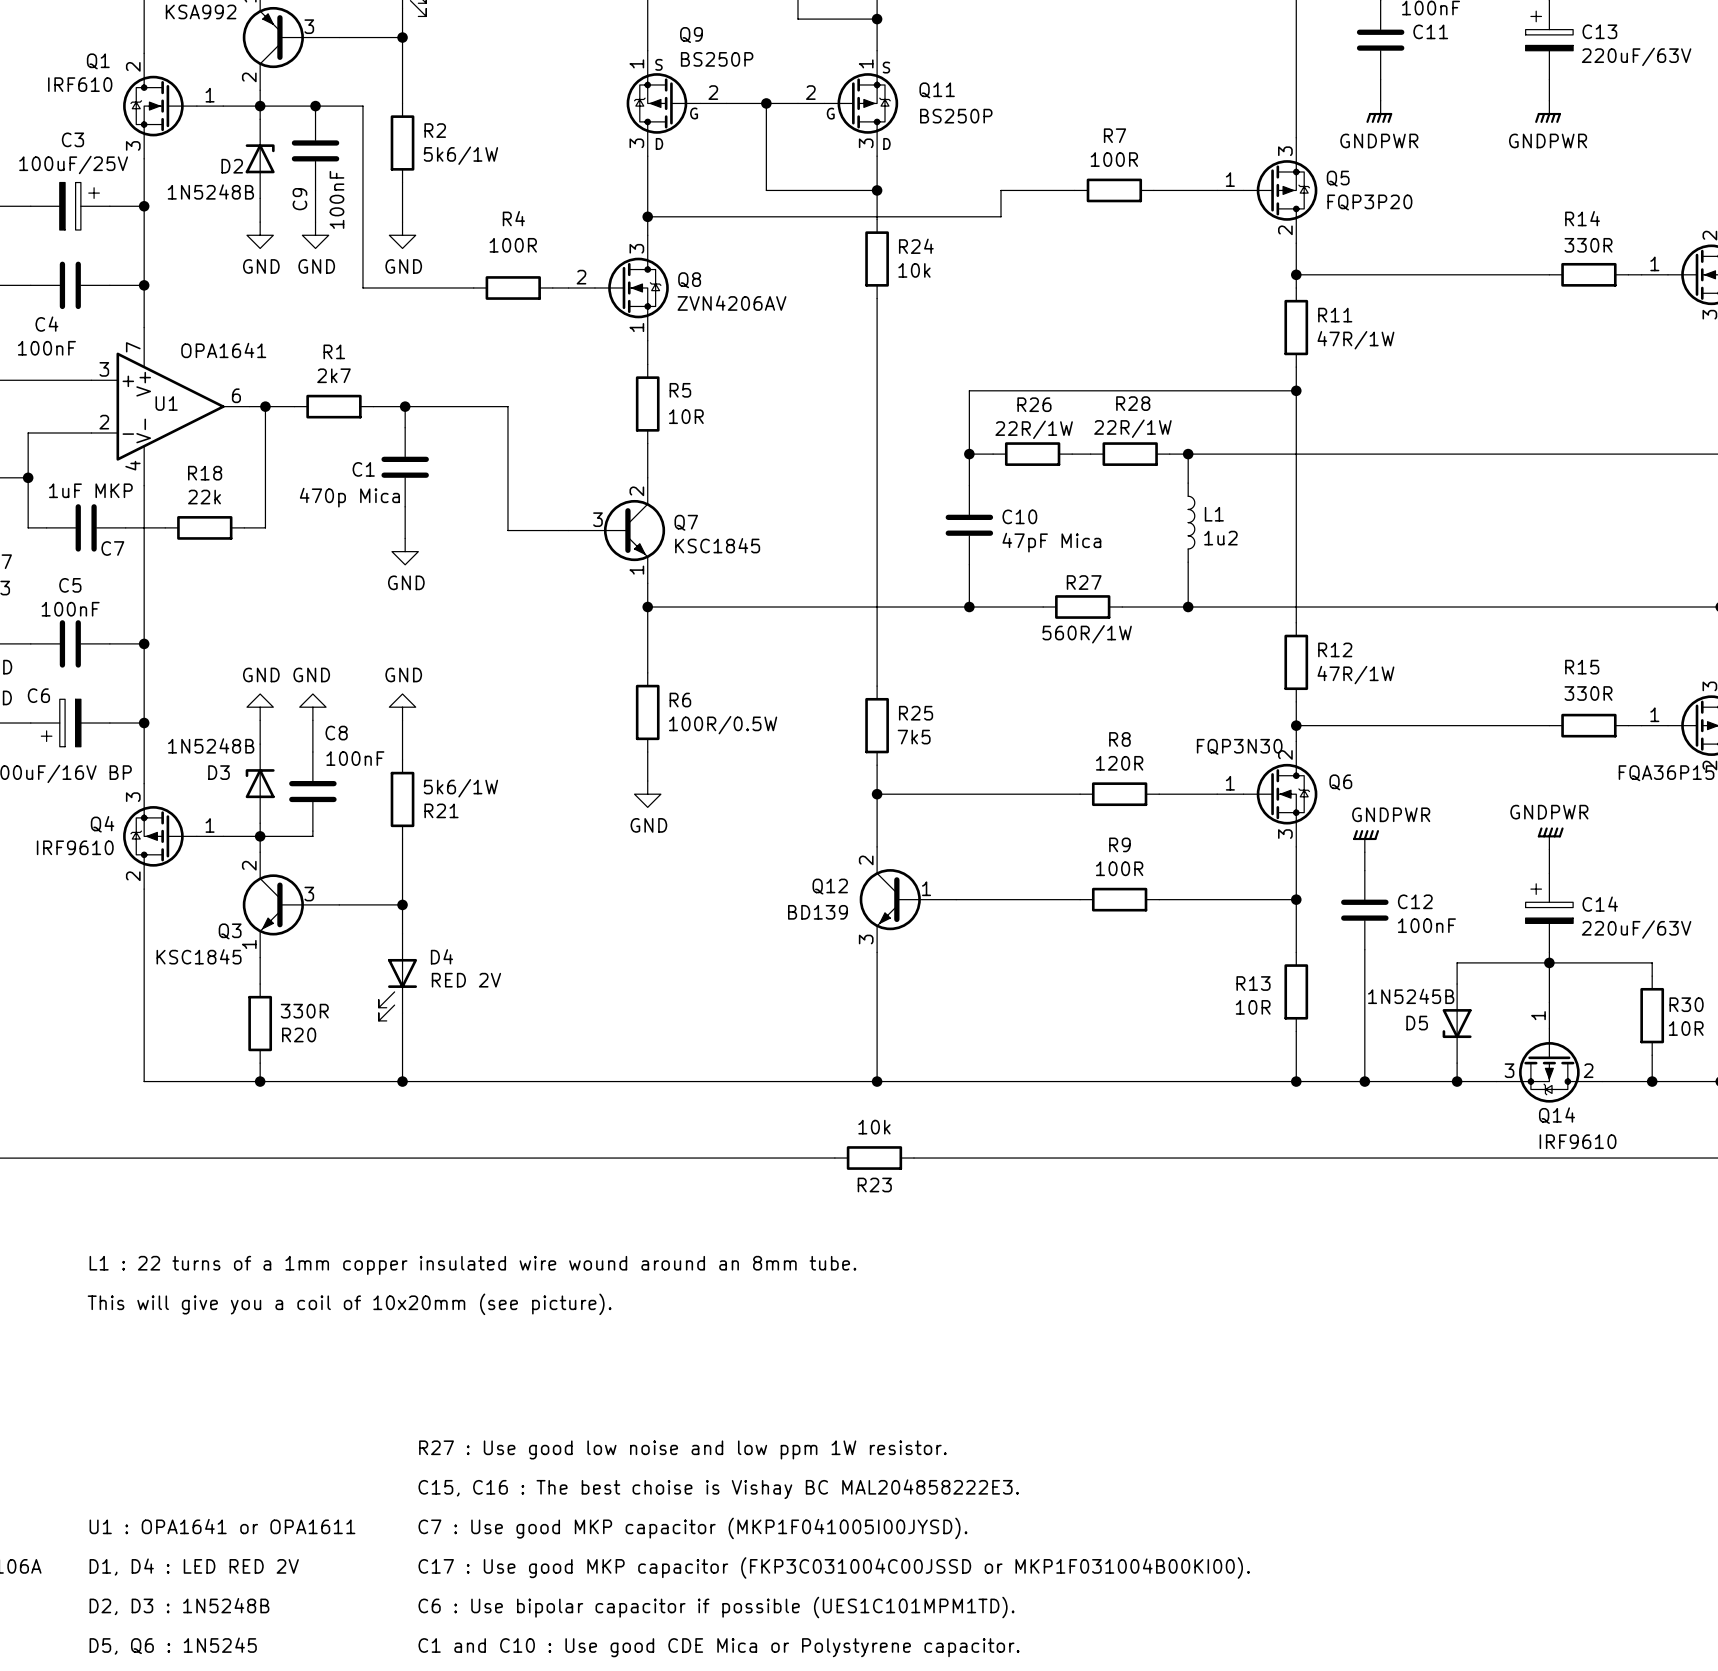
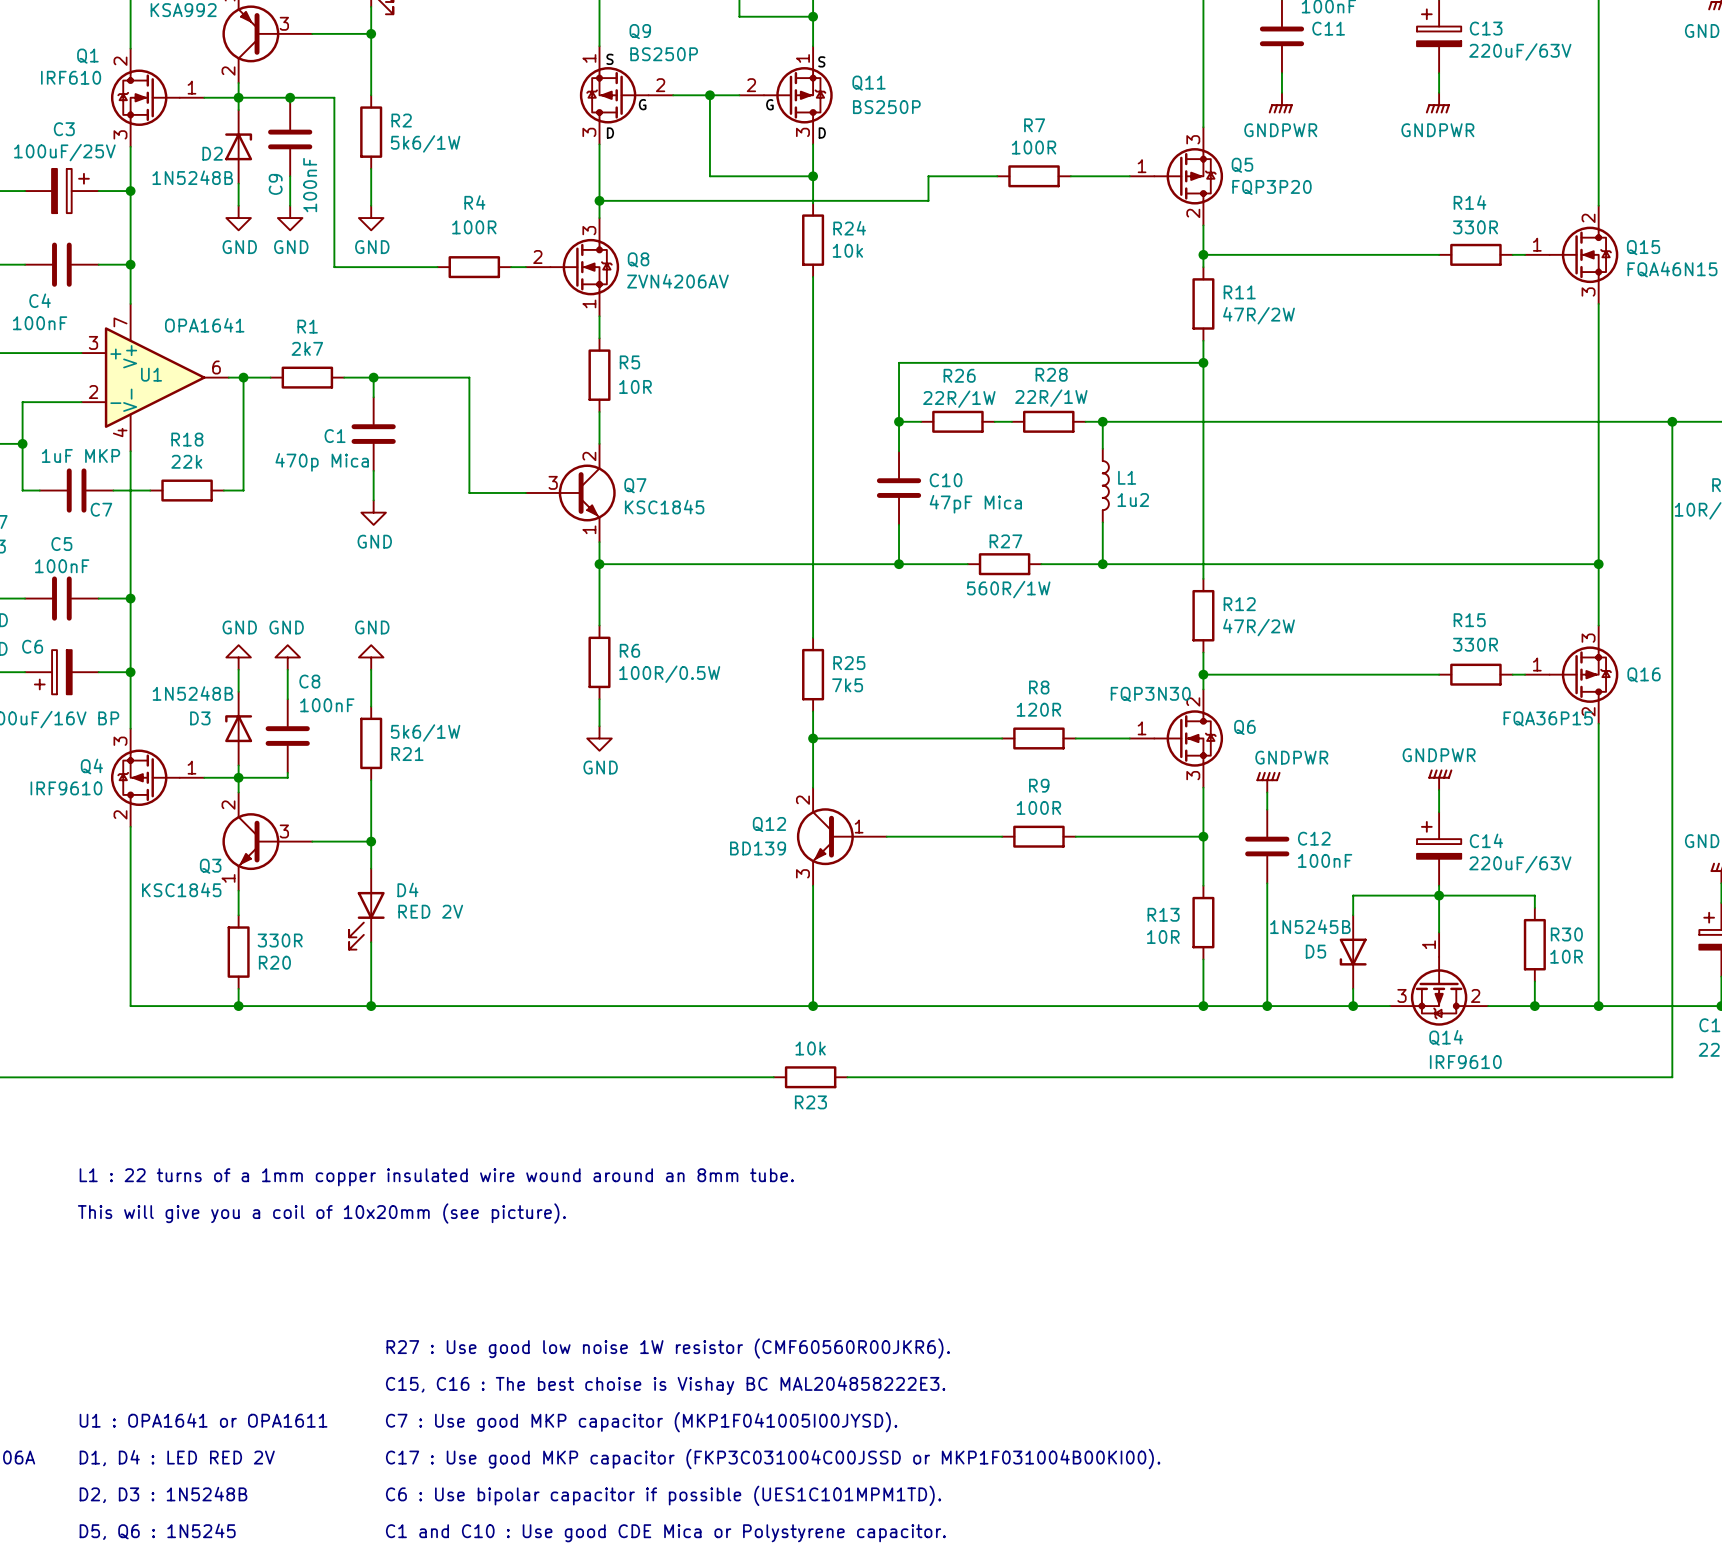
R11 value: 47R/1W (1355, 340) -> 47R/2W (1258, 315)
R12 value: 47R/1W (1355, 675) -> 47R/2W (1258, 627)
text: R27 : Use good low noise and low ppm 1W resistor. (682, 1449) -> R27 : Use good low noise 1W resistor (CMF60560R00JKR6). (668, 1348)

